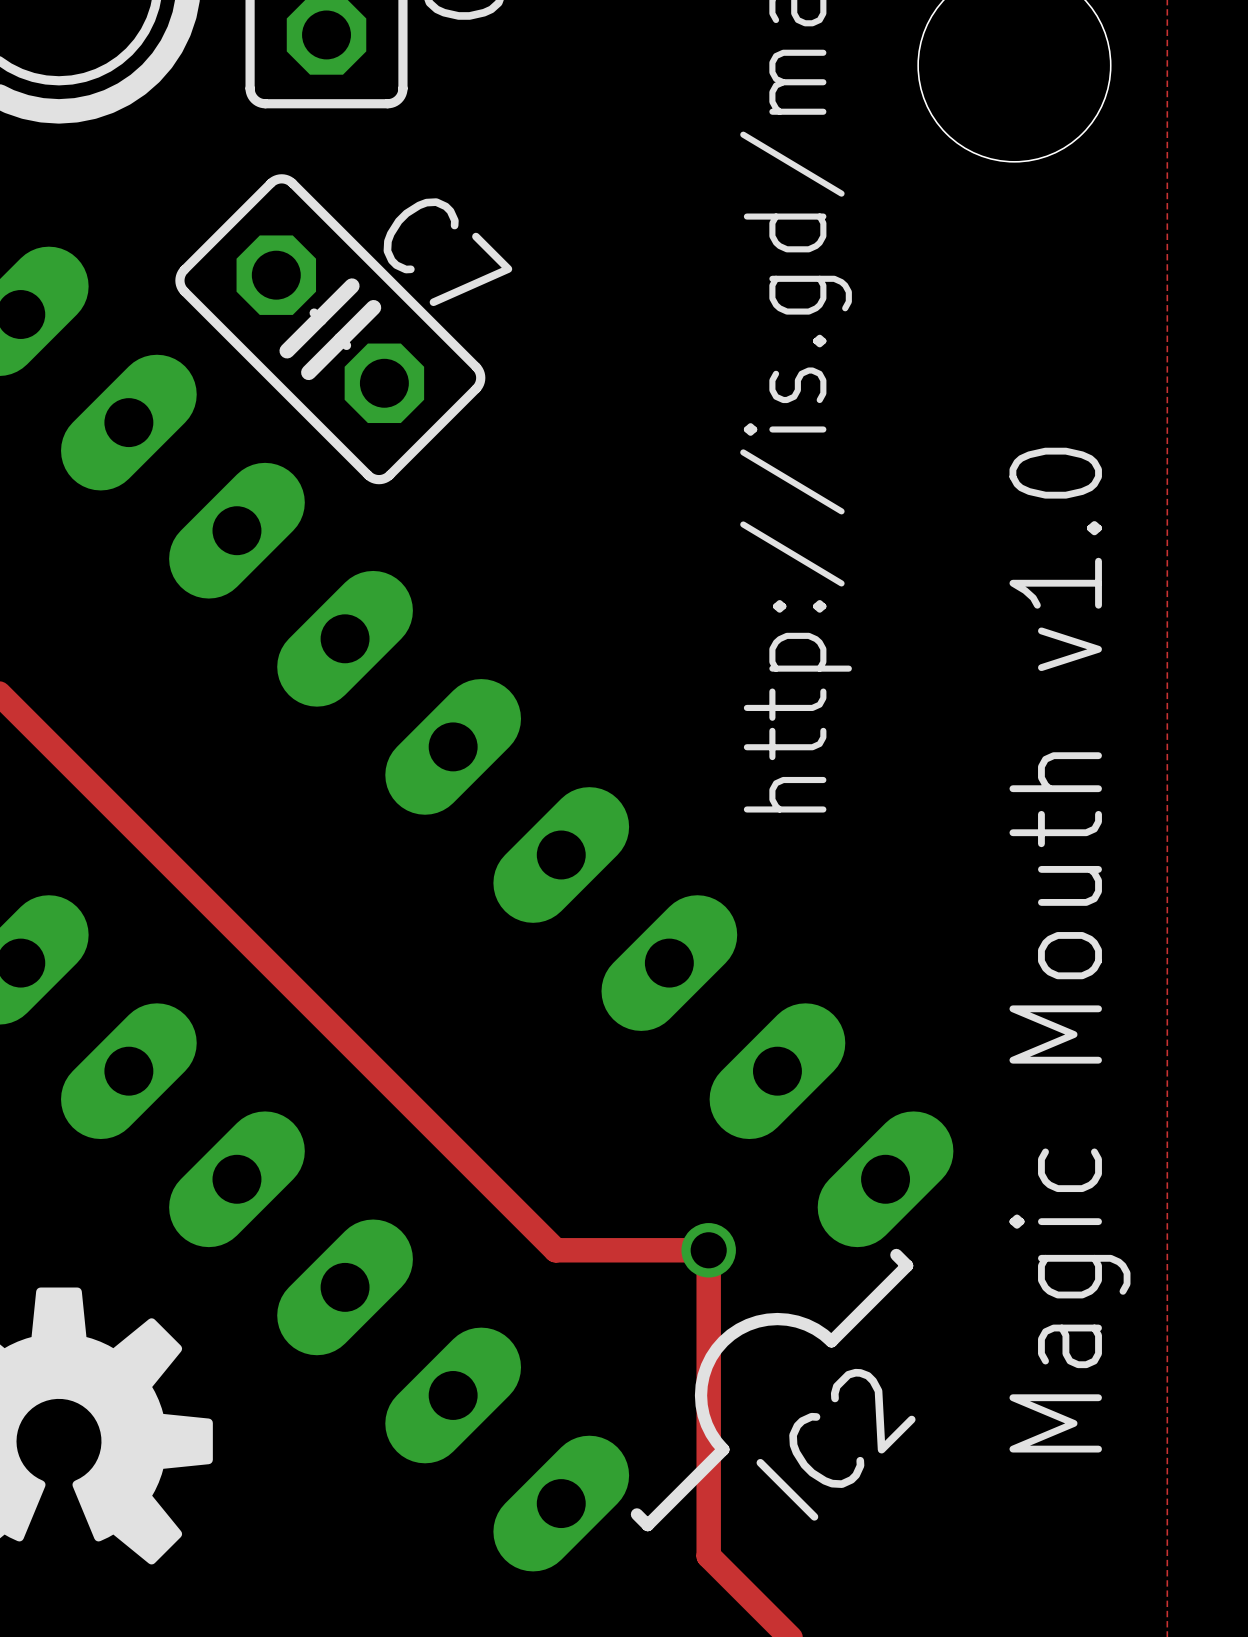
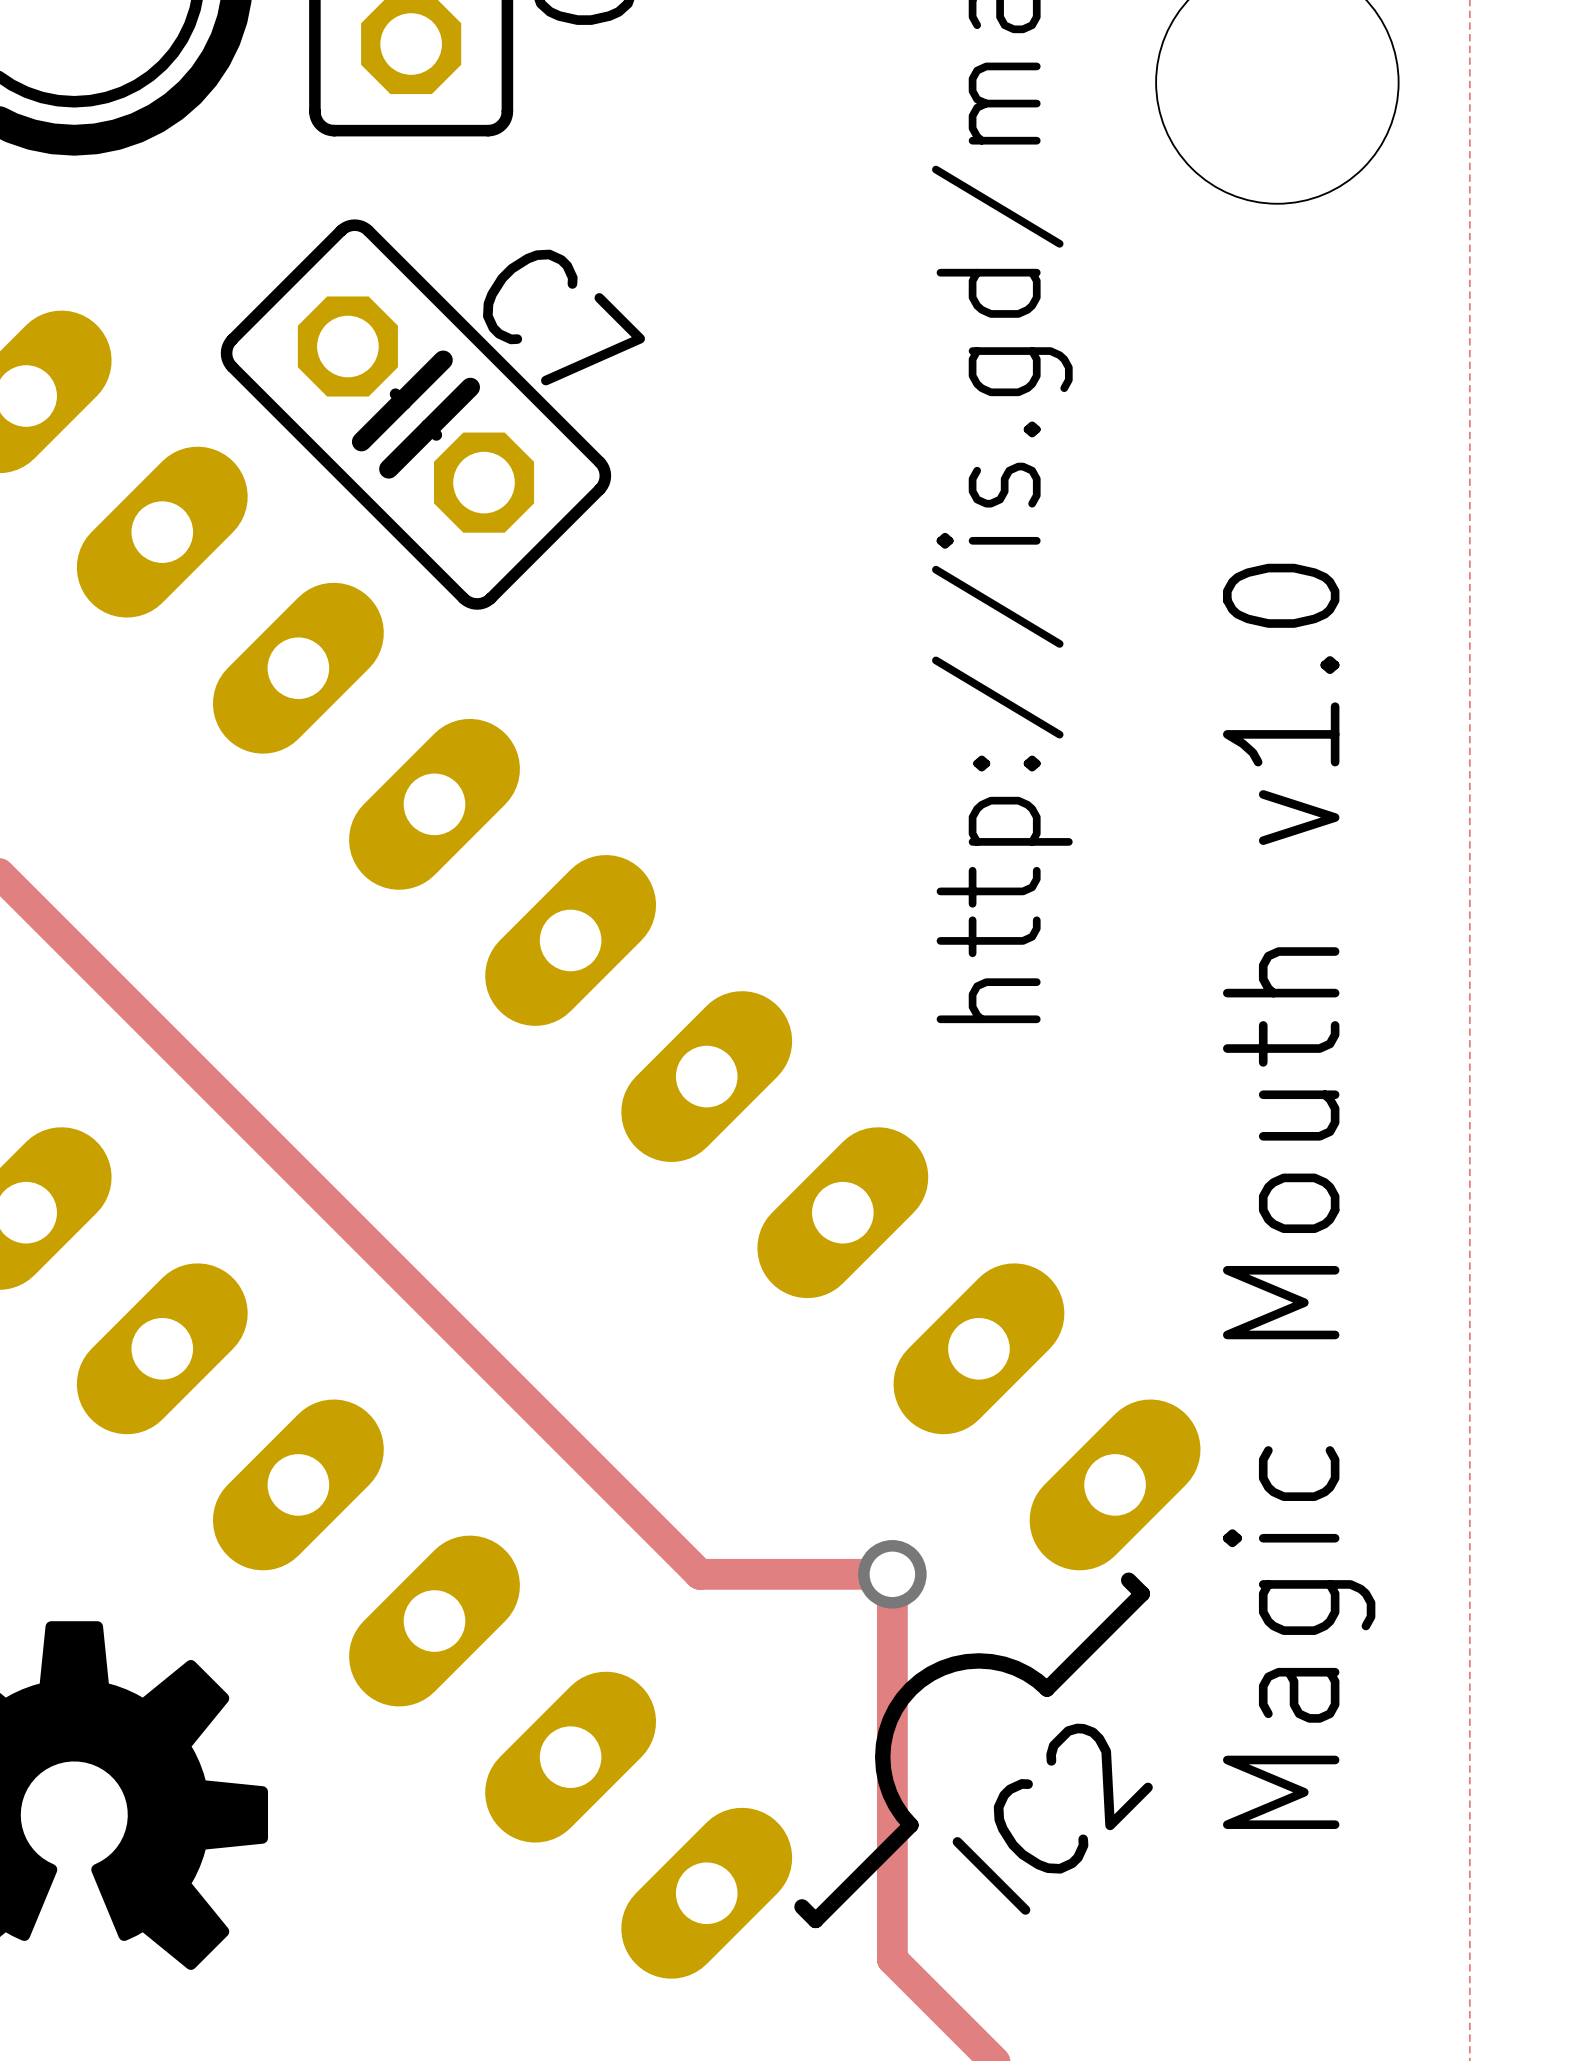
text position: Magic Mouth v1.0 (1069, 950) -> Magic Mouth v1.0 (1299, 1196)

